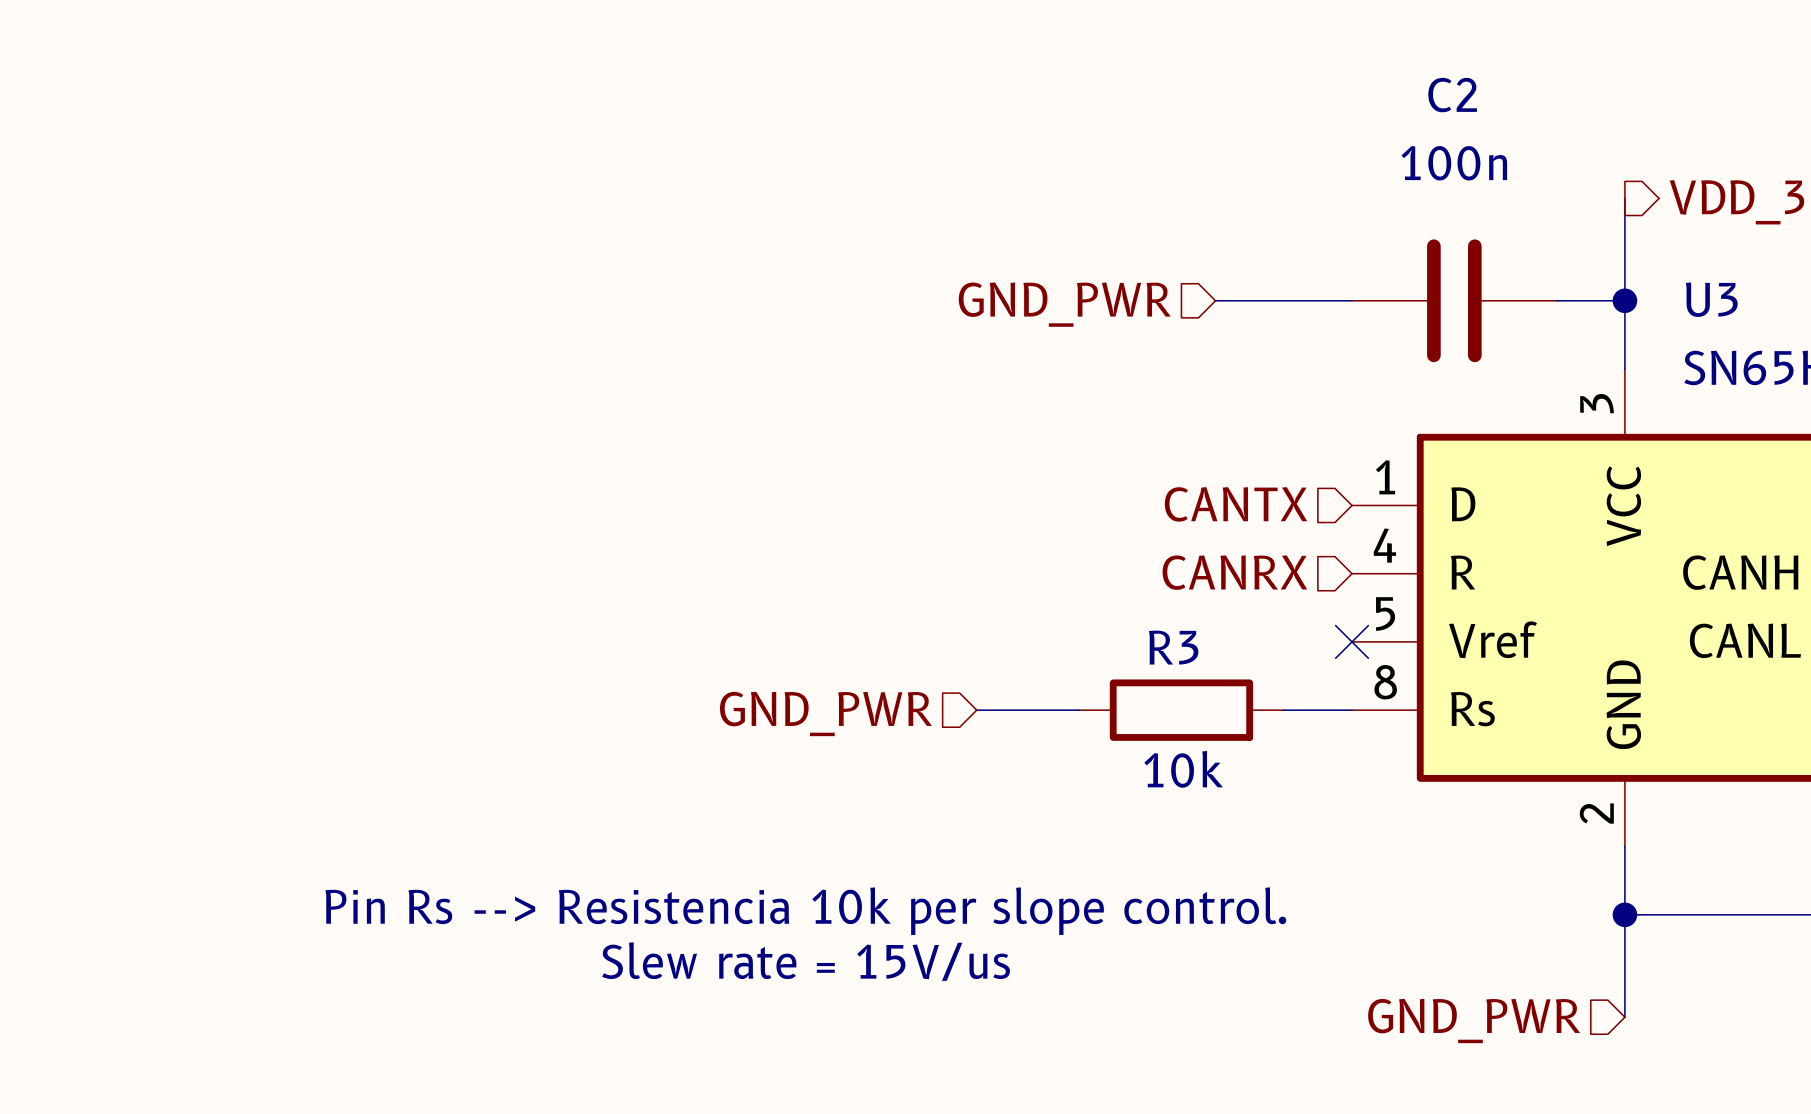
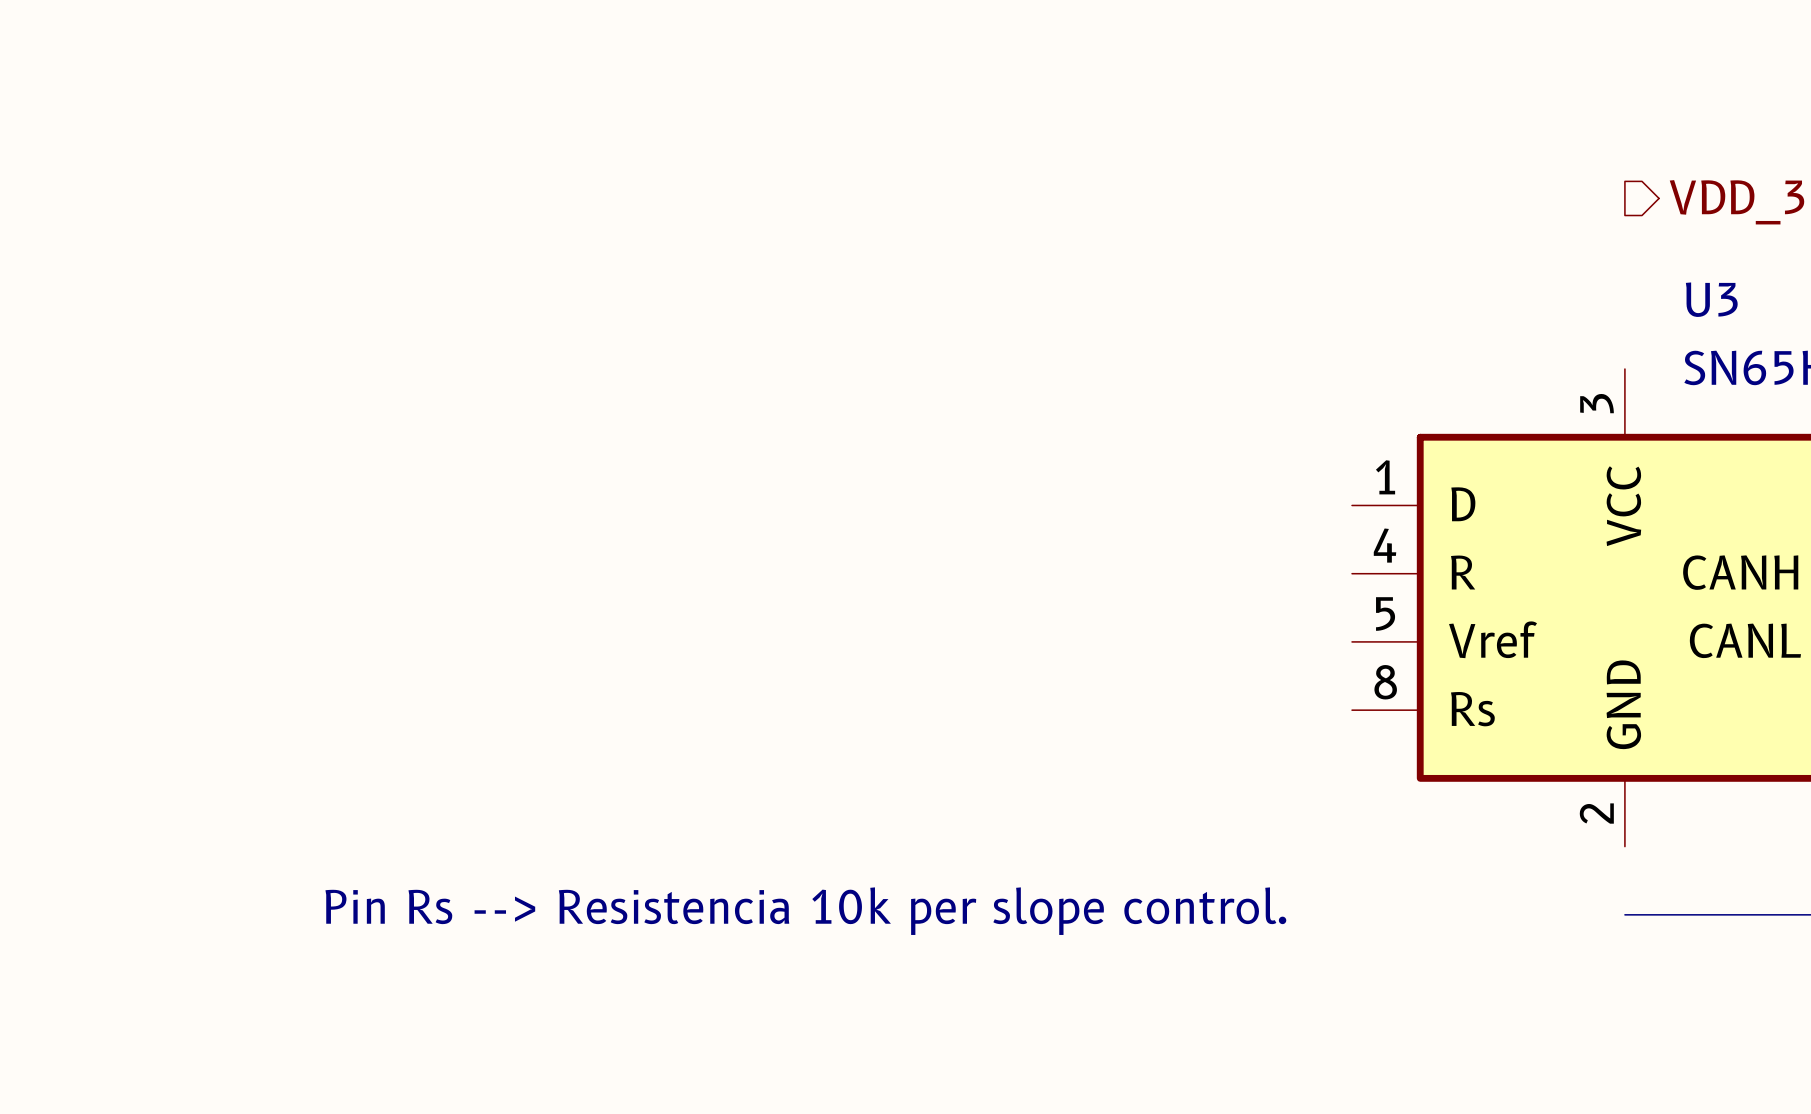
wire: (1624, 198) (1624, 369) -> none
wire: (1215, 300) (1352, 300) -> none
C2: 100n (1454, 300) -> none
wire: (1556, 300) (1624, 300) -> none
junction: (1624, 300) -> none
hierarchical label: GND_PWR (1064, 304) -> none
hierarchical label: CANTX (1236, 504) -> none
hierarchical label: CANRX (1234, 572) -> none
no-connect mark: (1352, 641) -> none
wire: (976, 710) (1079, 710) -> none
R3: 10k (1181, 710) -> none
wire: (1283, 710) (1352, 710) -> none
hierarchical label: GND_PWR (825, 713) -> none
wire: (1624, 846) (1624, 1017) -> none
junction: (1624, 914) -> none
text: Slew rate = 15V/us (806, 961) -> none
hierarchical label: GND_PWR (1474, 1021) -> none

